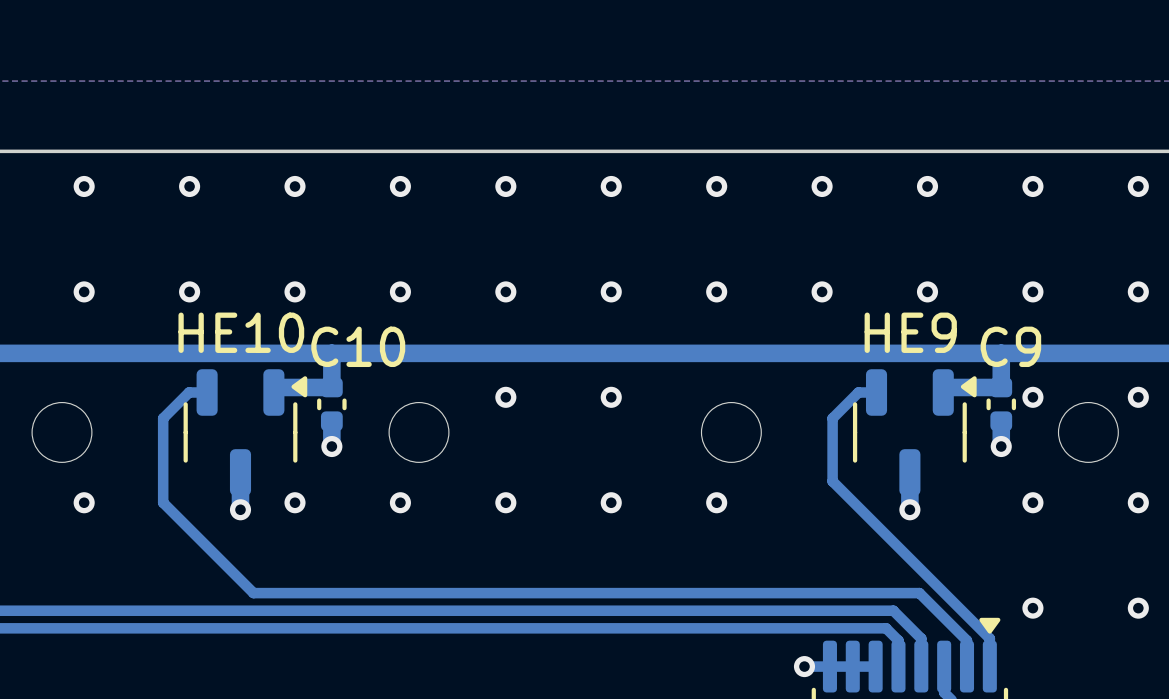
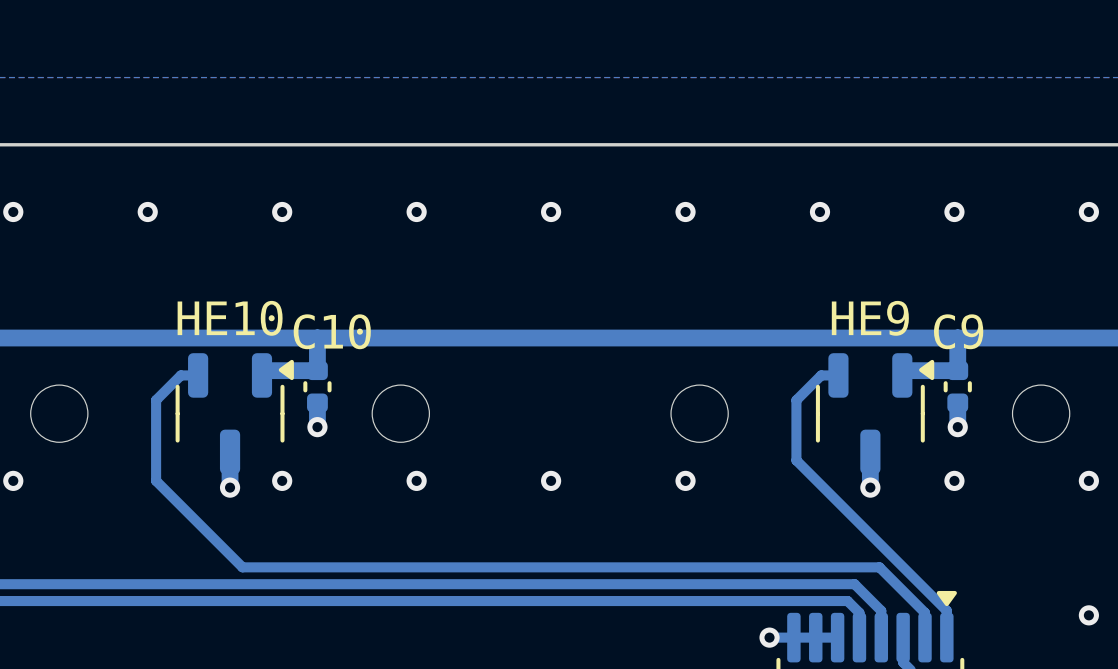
via: (84, 186) -> none
via: (189, 186) -> none
via: (295, 186) -> none
via: (400, 186) -> none
via: (505, 186) -> none
via: (611, 186) -> none
via: (716, 186) -> none
via: (822, 186) -> none
via: (927, 186) -> none
via: (1032, 186) -> none
via: (1138, 186) -> none
via: none -> (13, 212)
via: none -> (147, 212)
via: none -> (282, 212)
via: none -> (416, 212)
via: none -> (551, 212)
via: none -> (685, 212)
via: none -> (819, 212)
via: none -> (954, 212)
via: none -> (1088, 212)
via: (84, 291) -> none
via: (189, 291) -> none
via: (295, 291) -> none
via: (400, 291) -> none
via: (505, 291) -> none
via: (611, 291) -> none
via: (716, 291) -> none
via: (822, 291) -> none
via: (927, 291) -> none
via: (1032, 291) -> none
via: (1138, 291) -> none
via: (505, 397) -> none
via: (611, 397) -> none
via: (1032, 397) -> none
via: (1138, 397) -> none
via: none -> (13, 480)
via: (84, 502) -> none
via: (400, 502) -> none
via: none -> (416, 480)
via: (505, 502) -> none
via: none -> (551, 480)
via: (611, 502) -> none
via position: (1032, 502) -> (954, 480)
via: (1032, 608) -> none
via: (1138, 608) -> none
via: none -> (1088, 615)

